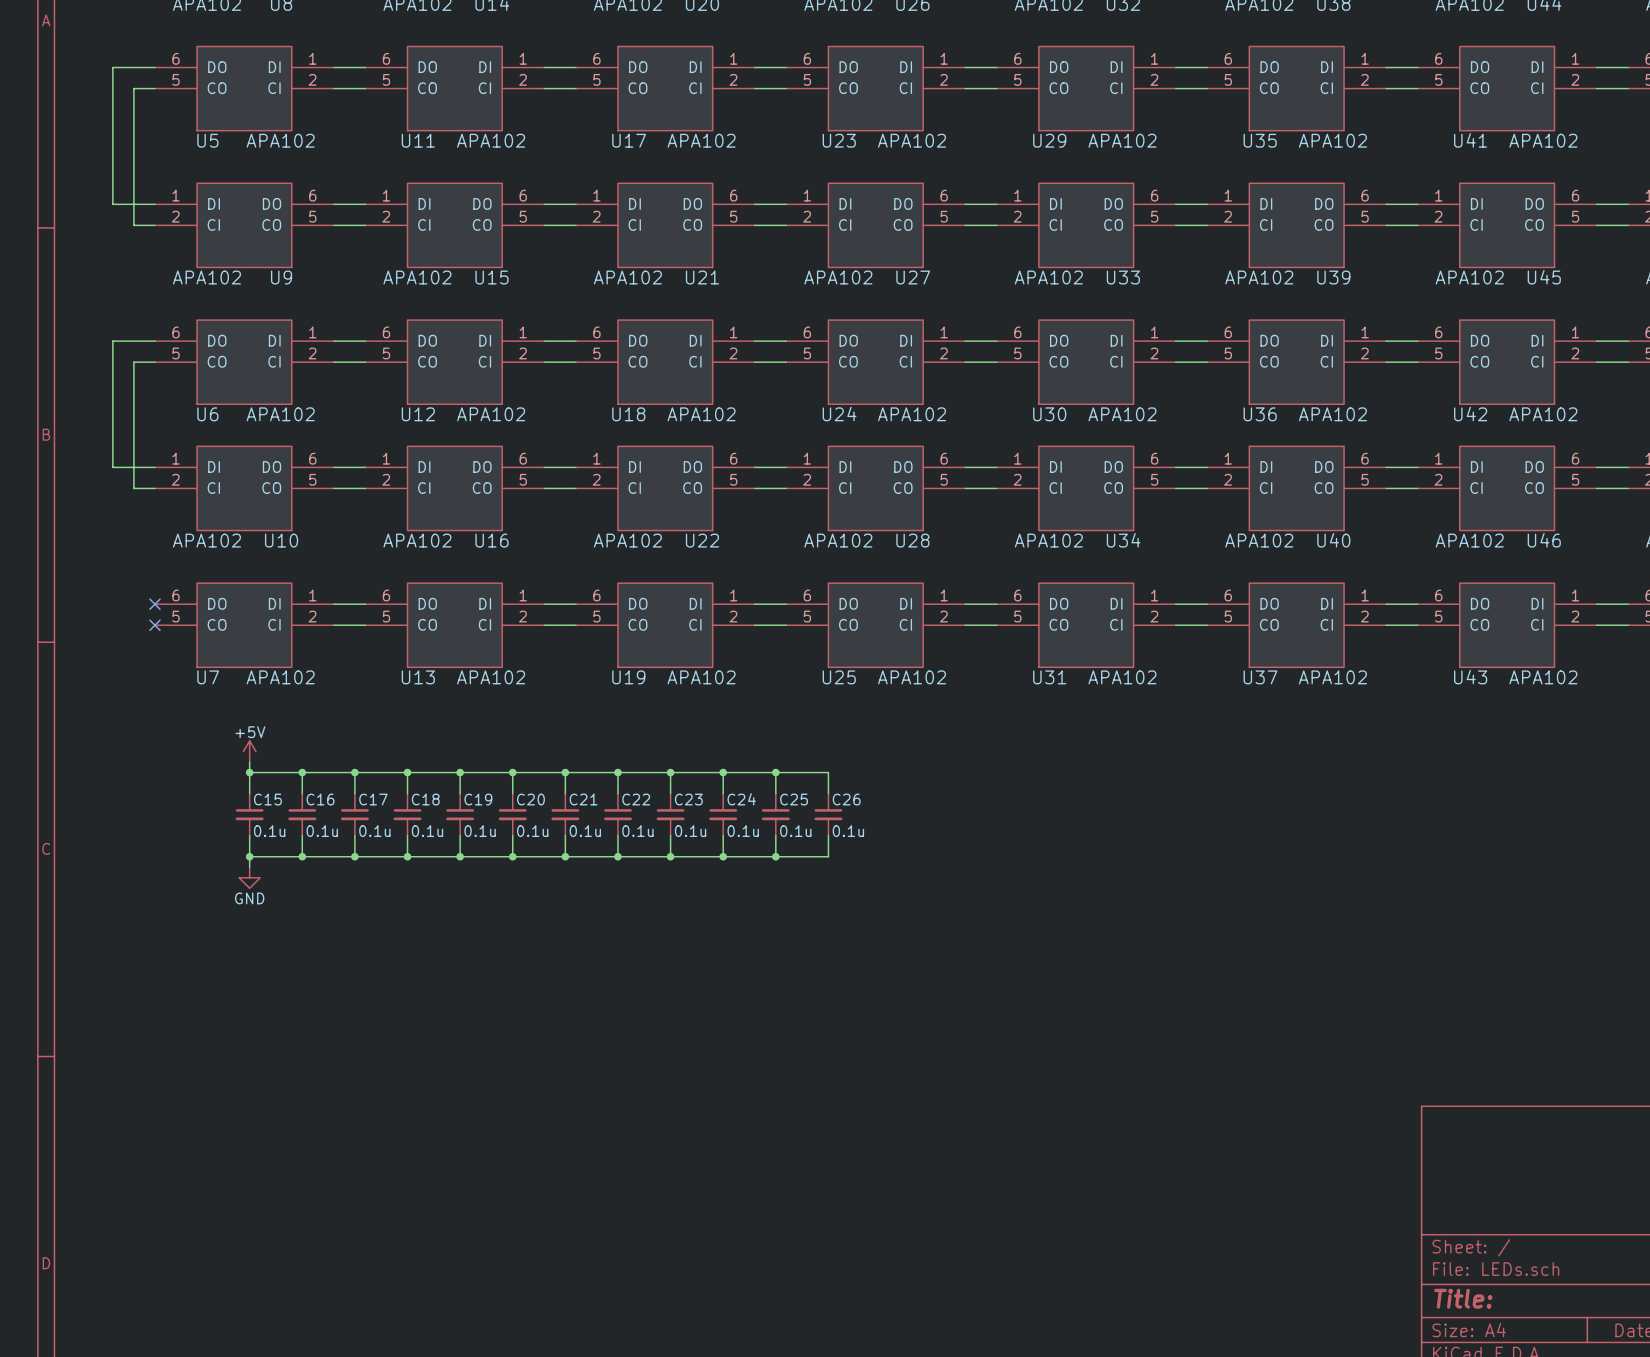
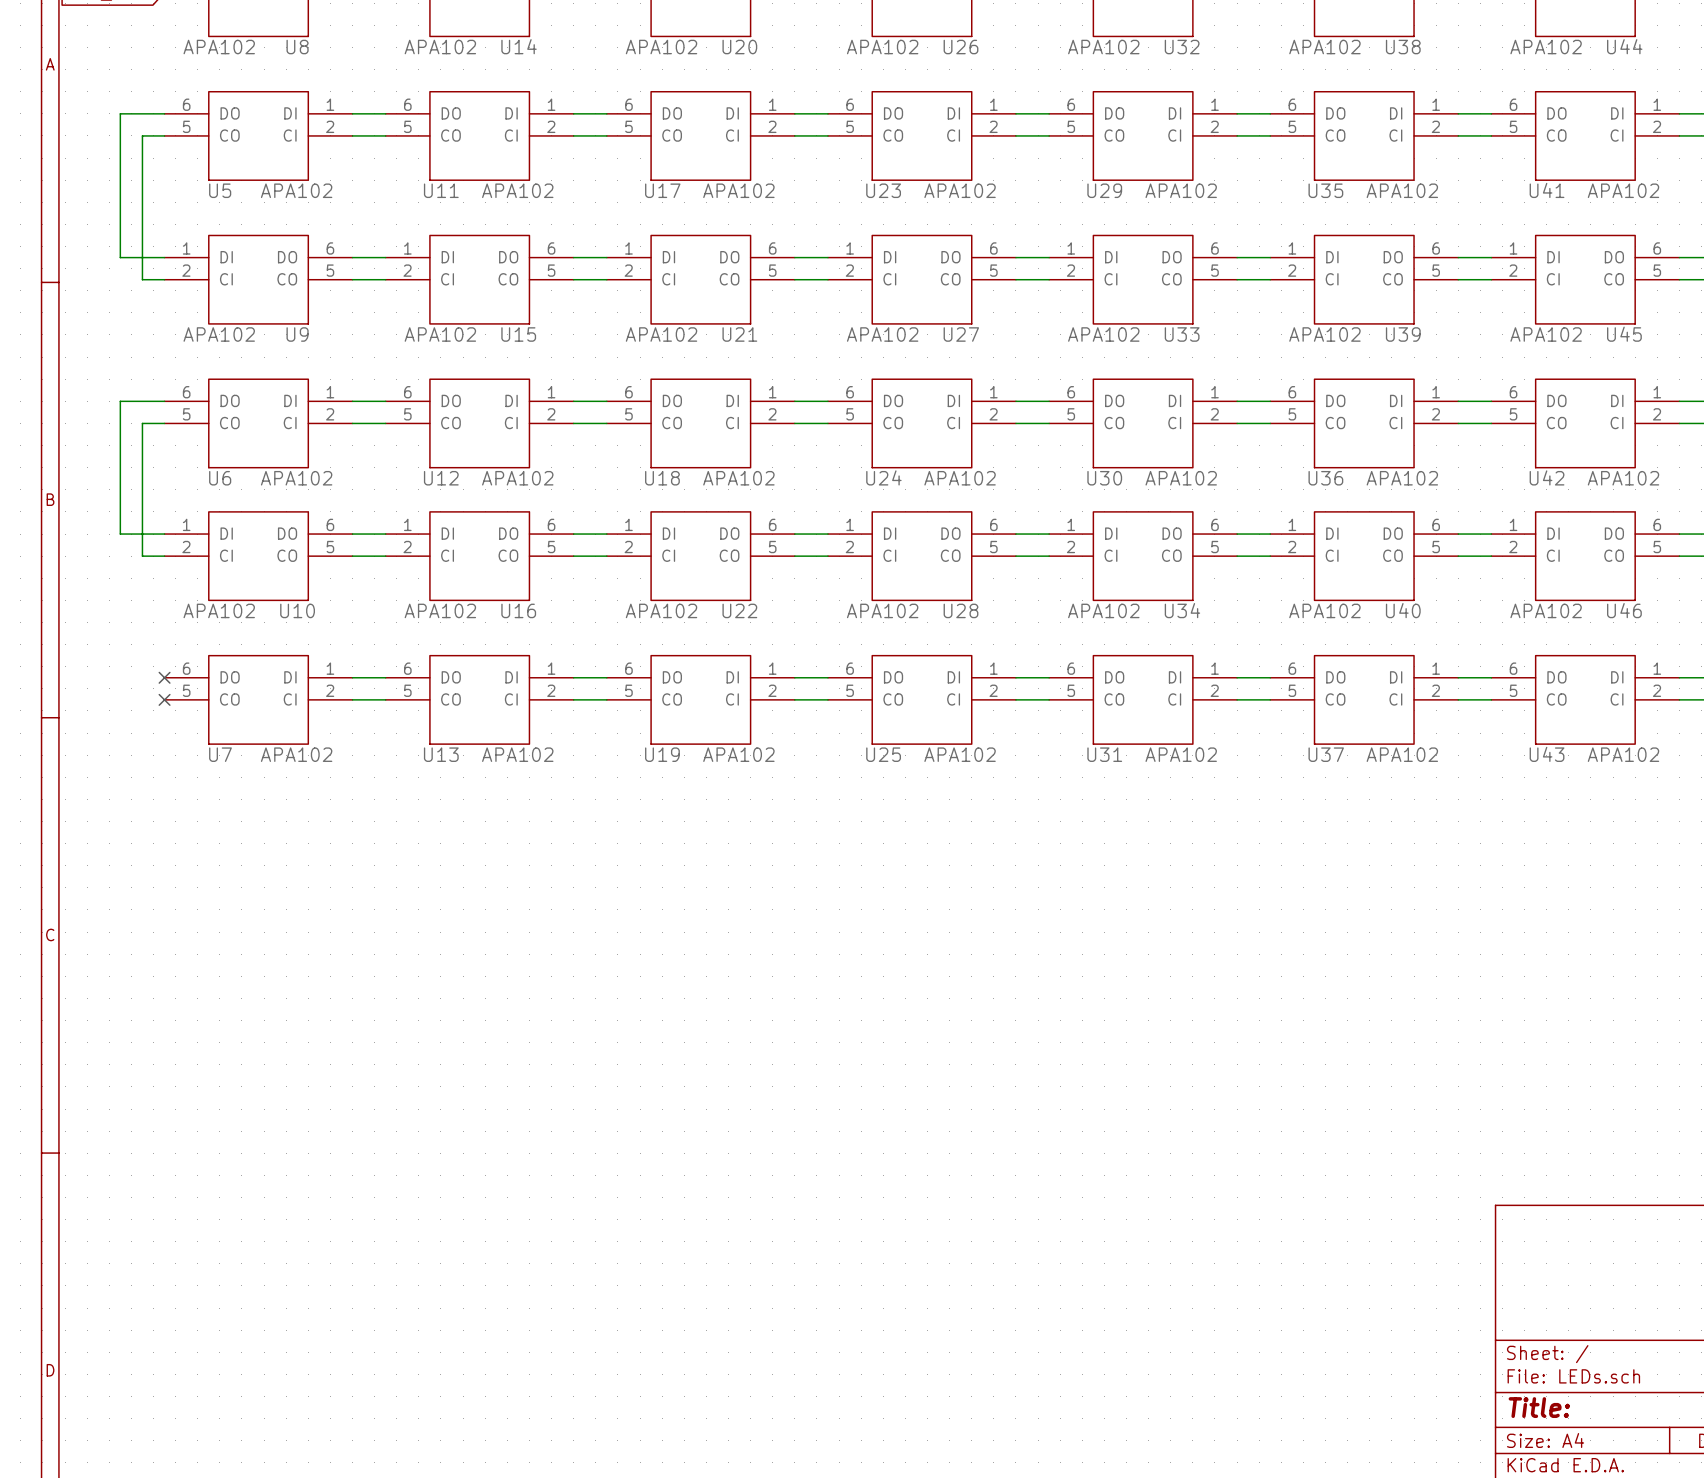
power symbol: +5V (249, 751) -> none
wire: (249, 762) (249, 793) -> none
wire: (249, 772) (828, 772) (828, 793) -> none
junction: (249, 772) -> none
wire: (302, 772) (302, 793) -> none
junction: (302, 772) -> none
wire: (354, 772) (354, 793) -> none
junction: (354, 772) -> none
wire: (407, 772) (407, 793) -> none
junction: (407, 772) -> none
wire: (460, 772) (460, 793) -> none
junction: (460, 772) -> none
wire: (512, 772) (512, 793) -> none
junction: (512, 772) -> none
wire: (565, 772) (565, 793) -> none
junction: (565, 772) -> none
wire: (617, 772) (617, 793) -> none
junction: (617, 772) -> none
wire: (670, 772) (670, 793) -> none
junction: (670, 772) -> none
wire: (723, 772) (723, 793) -> none
junction: (723, 772) -> none
wire: (775, 772) (775, 793) -> none
junction: (775, 772) -> none
C15: 0.1u (249, 814) -> none
C16: 0.1u (302, 814) -> none
C17: 0.1u (354, 814) -> none
C18: 0.1u (407, 814) -> none
C19: 0.1u (460, 814) -> none
C20: 0.1u (512, 814) -> none
C21: 0.1u (565, 814) -> none
C22: 0.1u (617, 814) -> none
C23: 0.1u (670, 814) -> none
C24: 0.1u (723, 814) -> none
C25: 0.1u (775, 814) -> none
C26: 0.1u (828, 814) -> none
wire: (249, 835) (249, 867) -> none
wire: (302, 835) (302, 856) -> none
wire: (354, 835) (354, 856) -> none
wire: (407, 835) (407, 856) -> none
wire: (460, 835) (460, 856) -> none
wire: (512, 835) (512, 856) -> none
wire: (565, 835) (565, 856) -> none
wire: (617, 835) (617, 856) -> none
wire: (670, 835) (670, 856) -> none
wire: (723, 835) (723, 856) -> none
wire: (775, 835) (775, 856) -> none
wire: (828, 835) (828, 856) (249, 856) -> none
junction: (249, 856) -> none
junction: (302, 856) -> none
junction: (354, 856) -> none
junction: (407, 856) -> none
junction: (460, 856) -> none
junction: (512, 856) -> none
junction: (565, 856) -> none
junction: (617, 856) -> none
junction: (670, 856) -> none
junction: (723, 856) -> none
junction: (775, 856) -> none
power symbol: GND (249, 877) -> none

